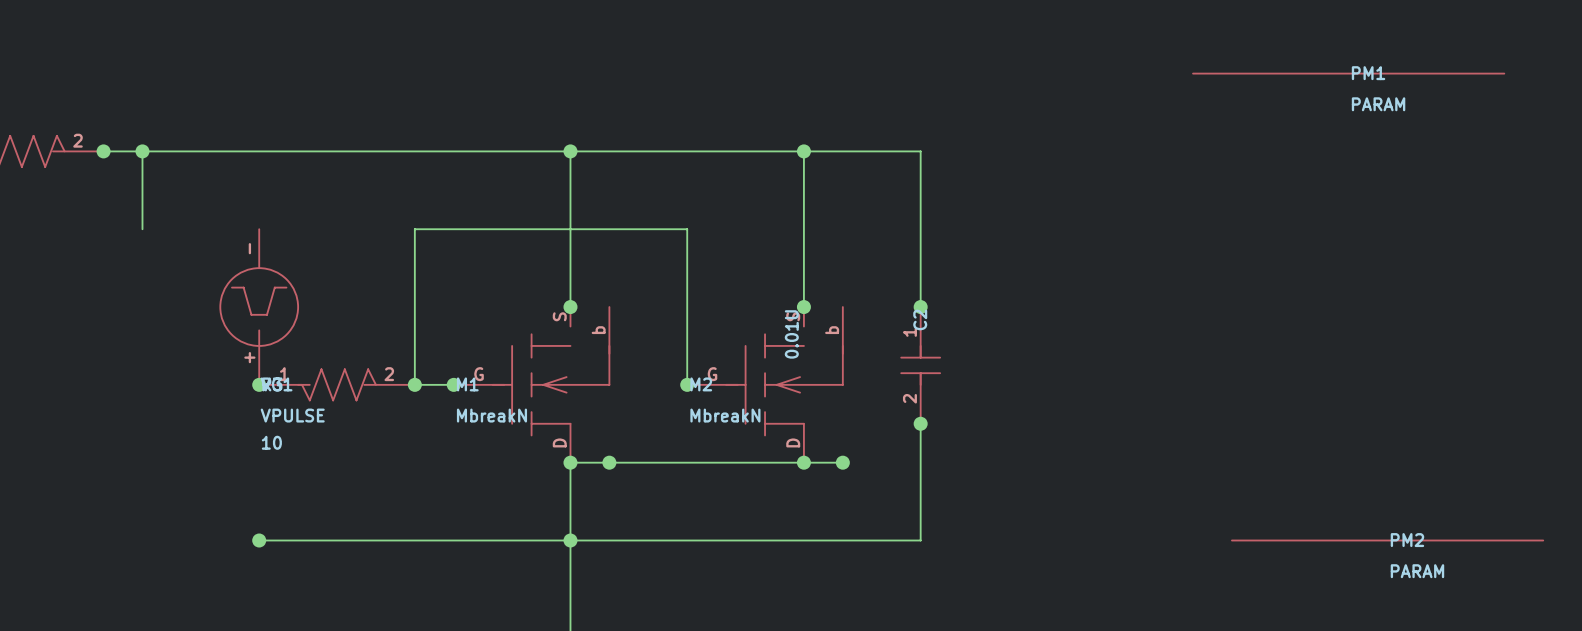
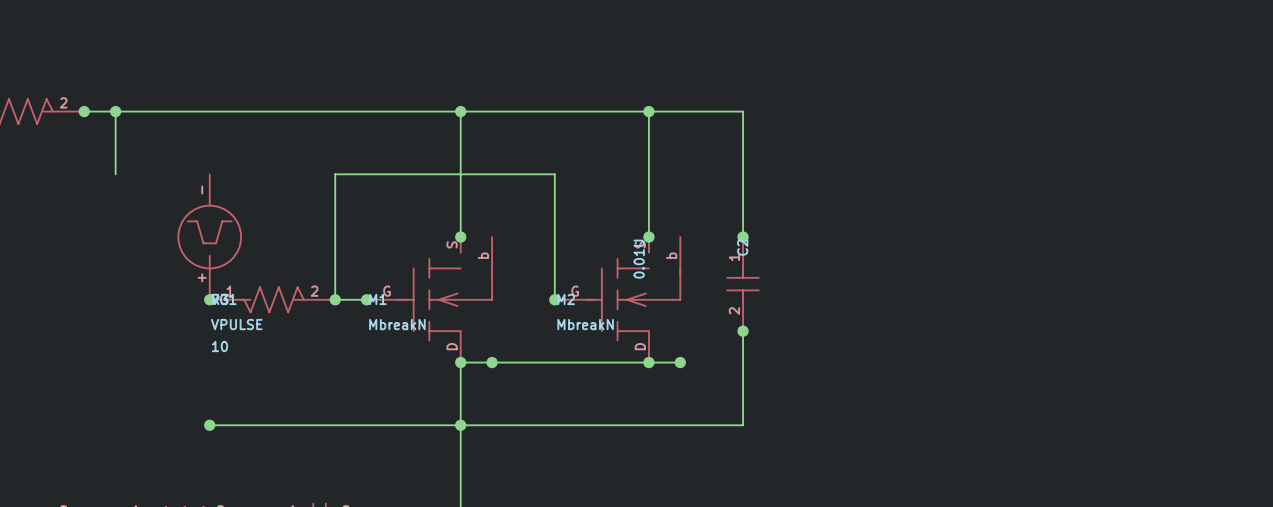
PM1: PARAM (1348, 73) -> none
PM2: PARAM (1387, 540) -> none

